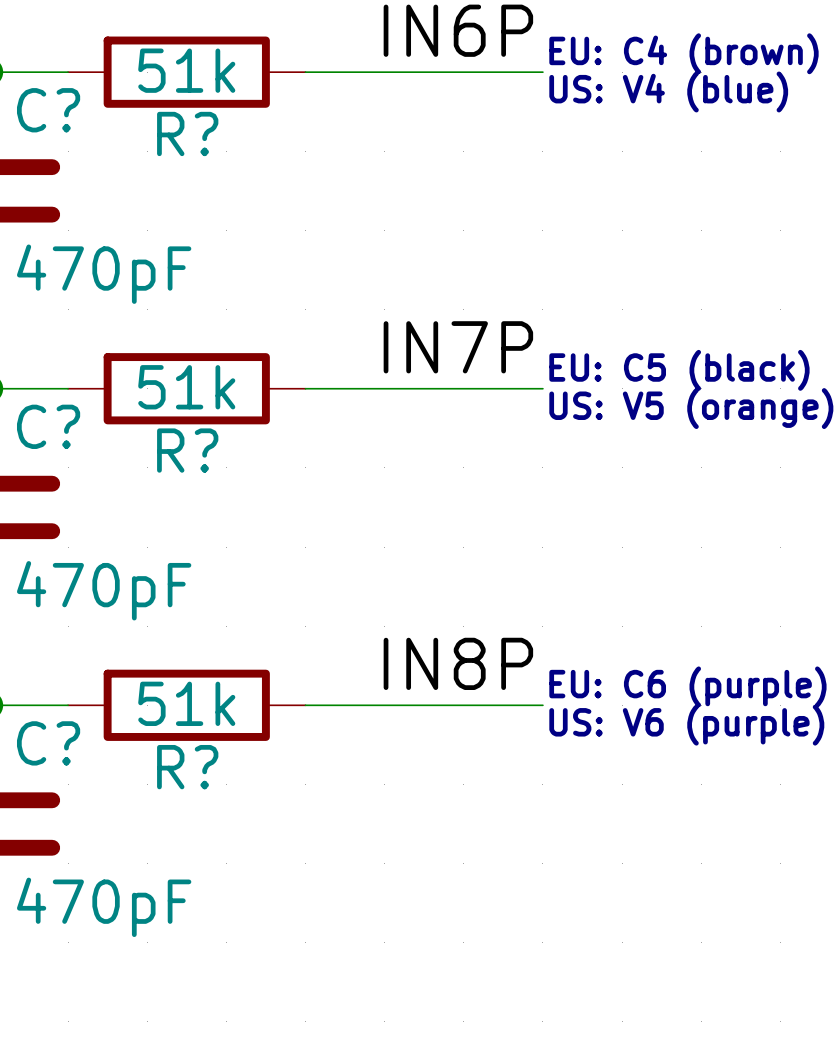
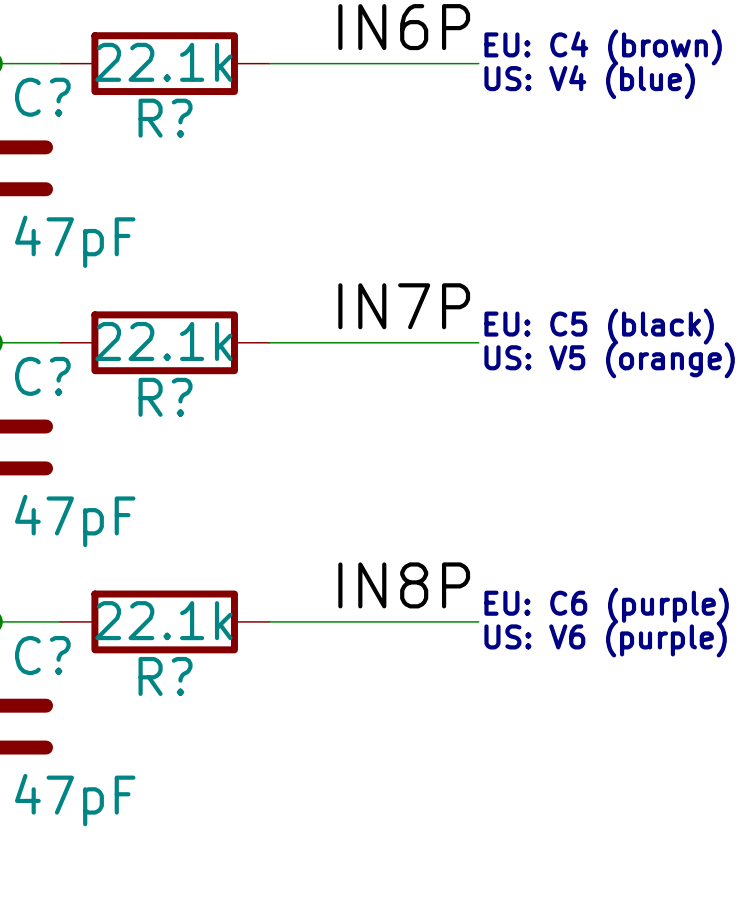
R? value: 51k (186, 70) -> 22.1k (163, 62)
C? value: 470pF (104, 274) -> 47pF (75, 241)
R? value: 51k (186, 387) -> 22.1k (163, 341)
C? value: 470pF (104, 590) -> 47pF (75, 520)
R? value: 51k (186, 703) -> 22.1k (163, 620)
C? value: 470pF (104, 907) -> 47pF (75, 800)

